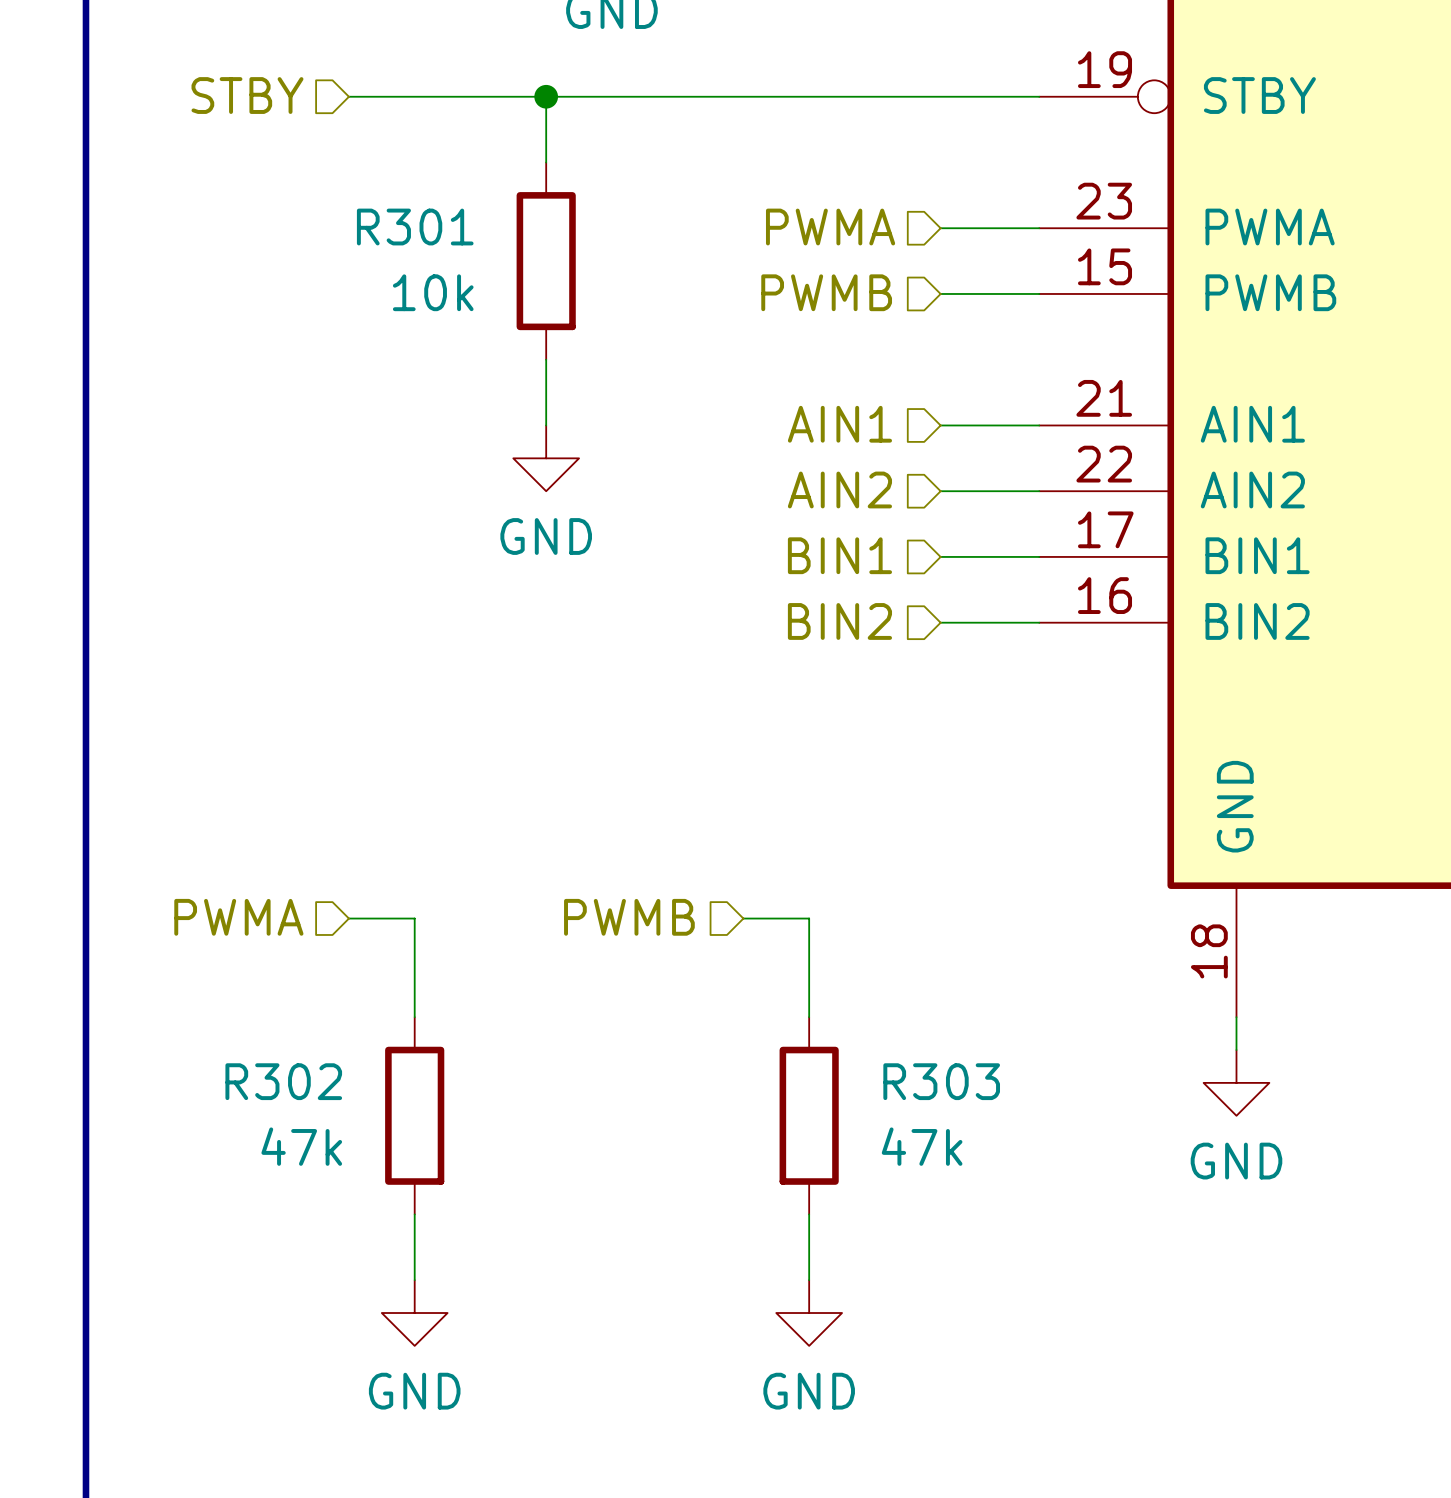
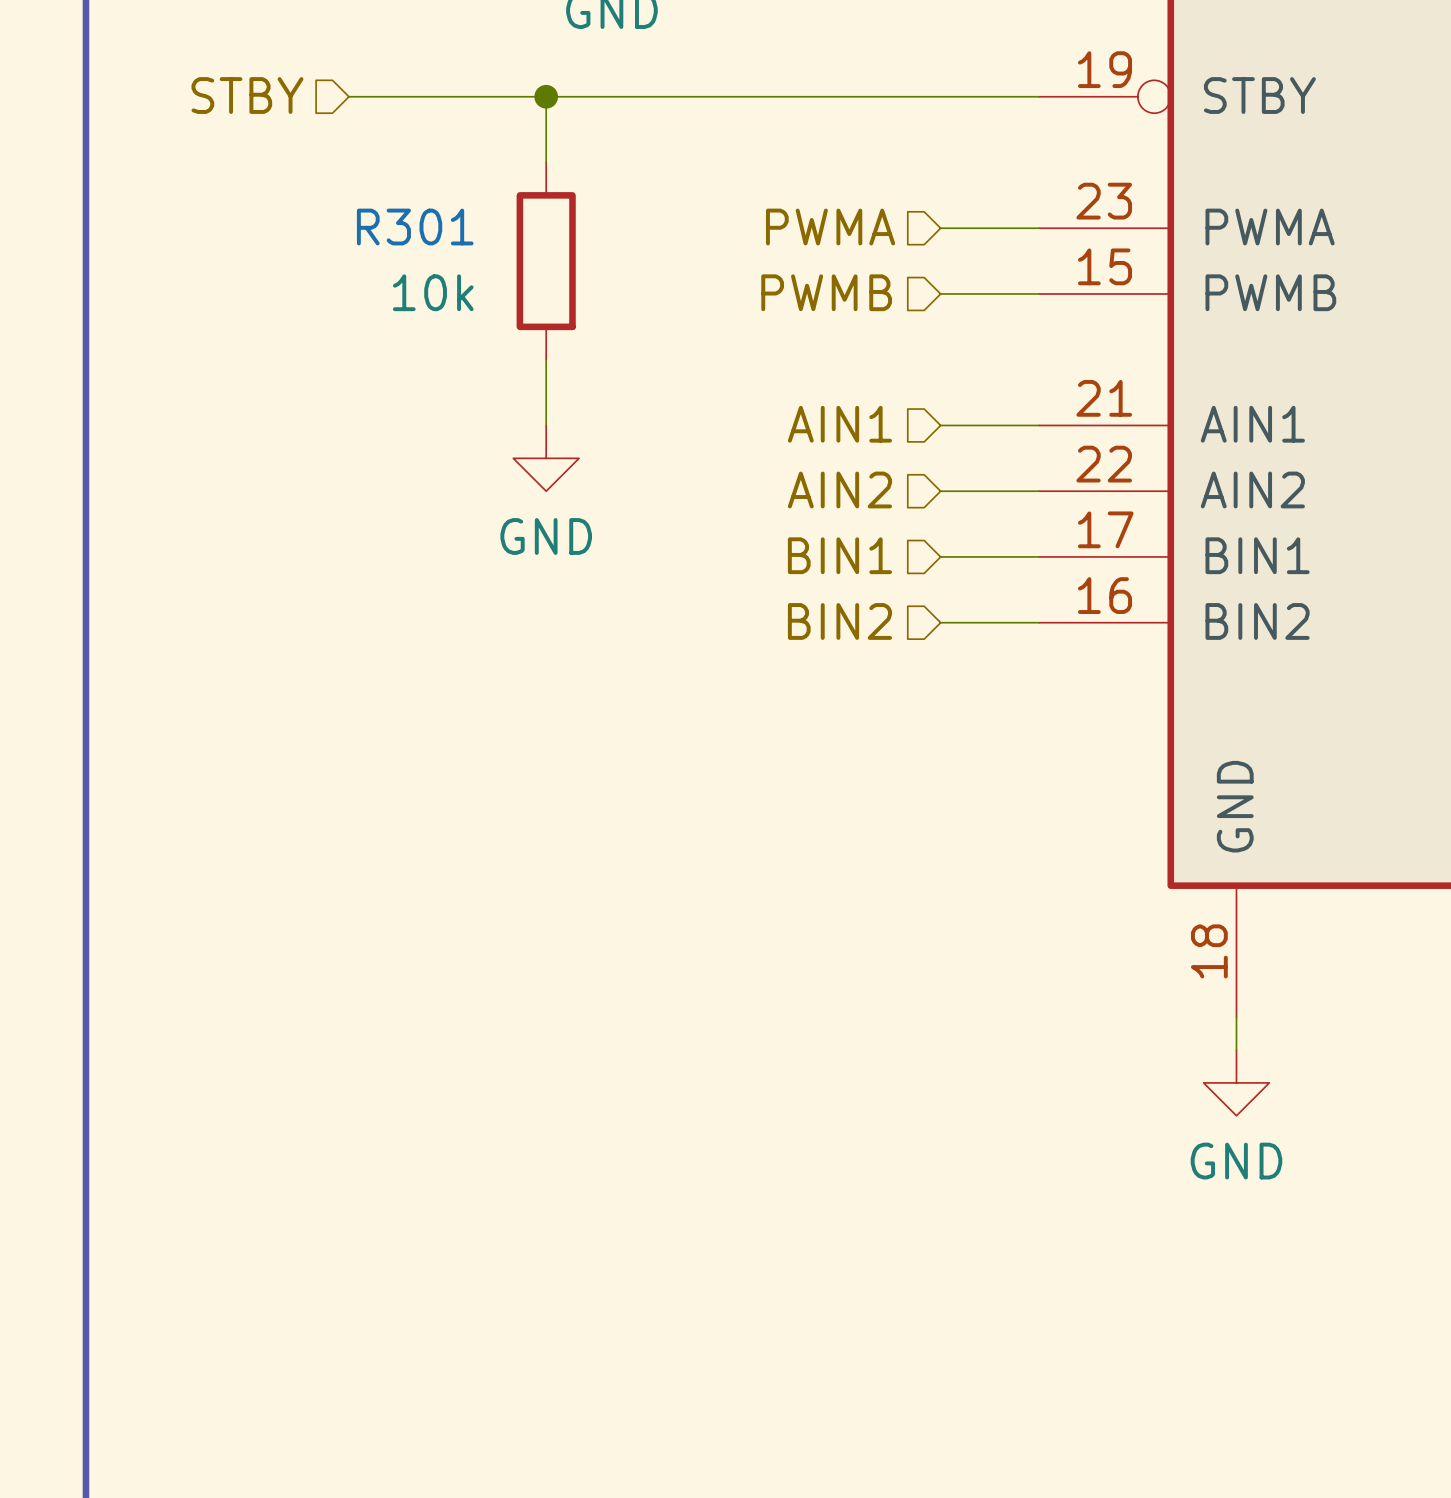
hierarchical label: PWMA (238, 917) -> none
hierarchical label: PWMB (629, 917) -> none
wire: (348, 918) (414, 918) (414, 1017) -> none
wire: (743, 918) (809, 918) (809, 1017) -> none
R302: 47k (414, 1115) -> none
R303: 47k (809, 1115) -> none
wire: (414, 1214) (414, 1280) -> none
wire: (809, 1214) (809, 1280) -> none
power symbol: GND (414, 1313) -> none
power symbol: GND (809, 1313) -> none

